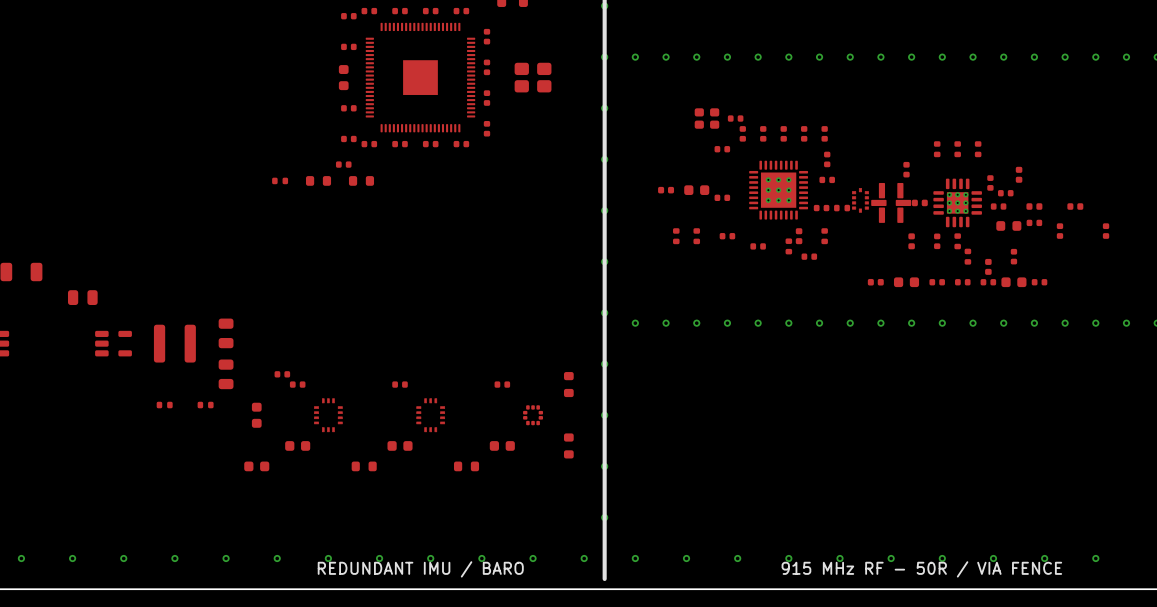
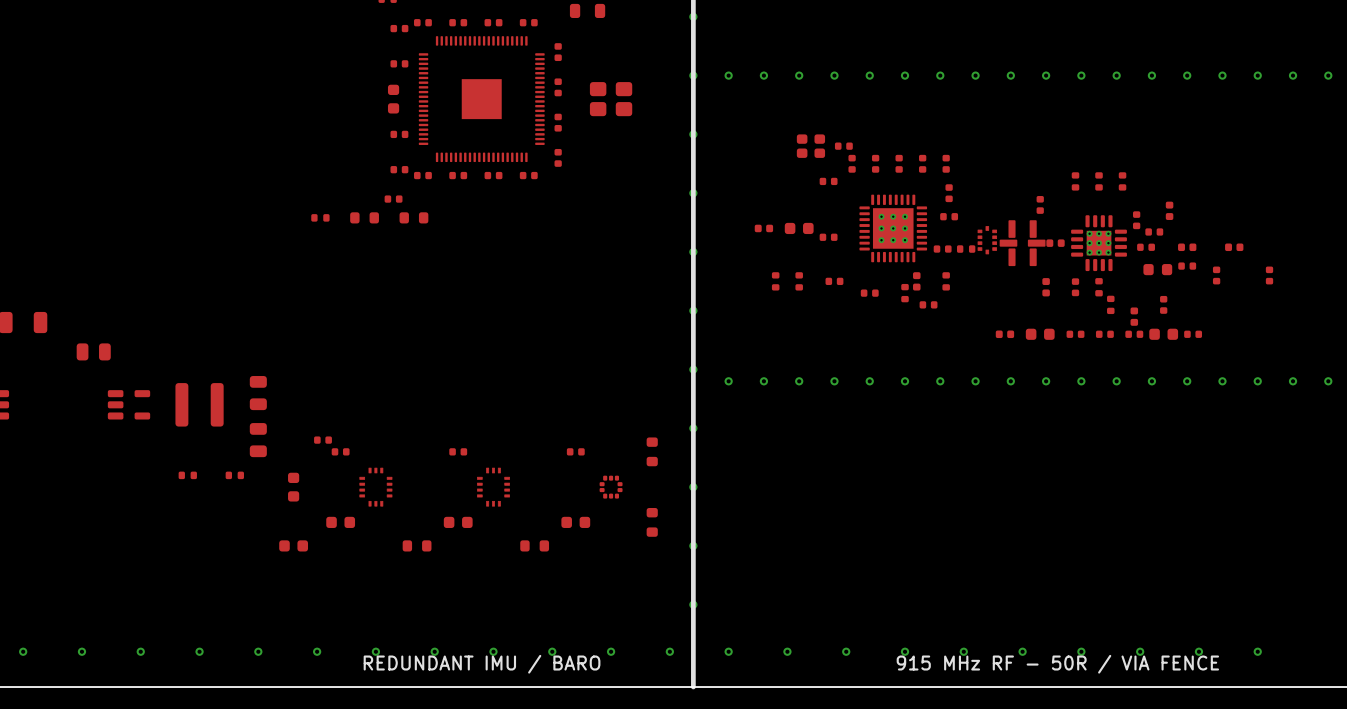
line: none -> (693, 675) (693, 687)

